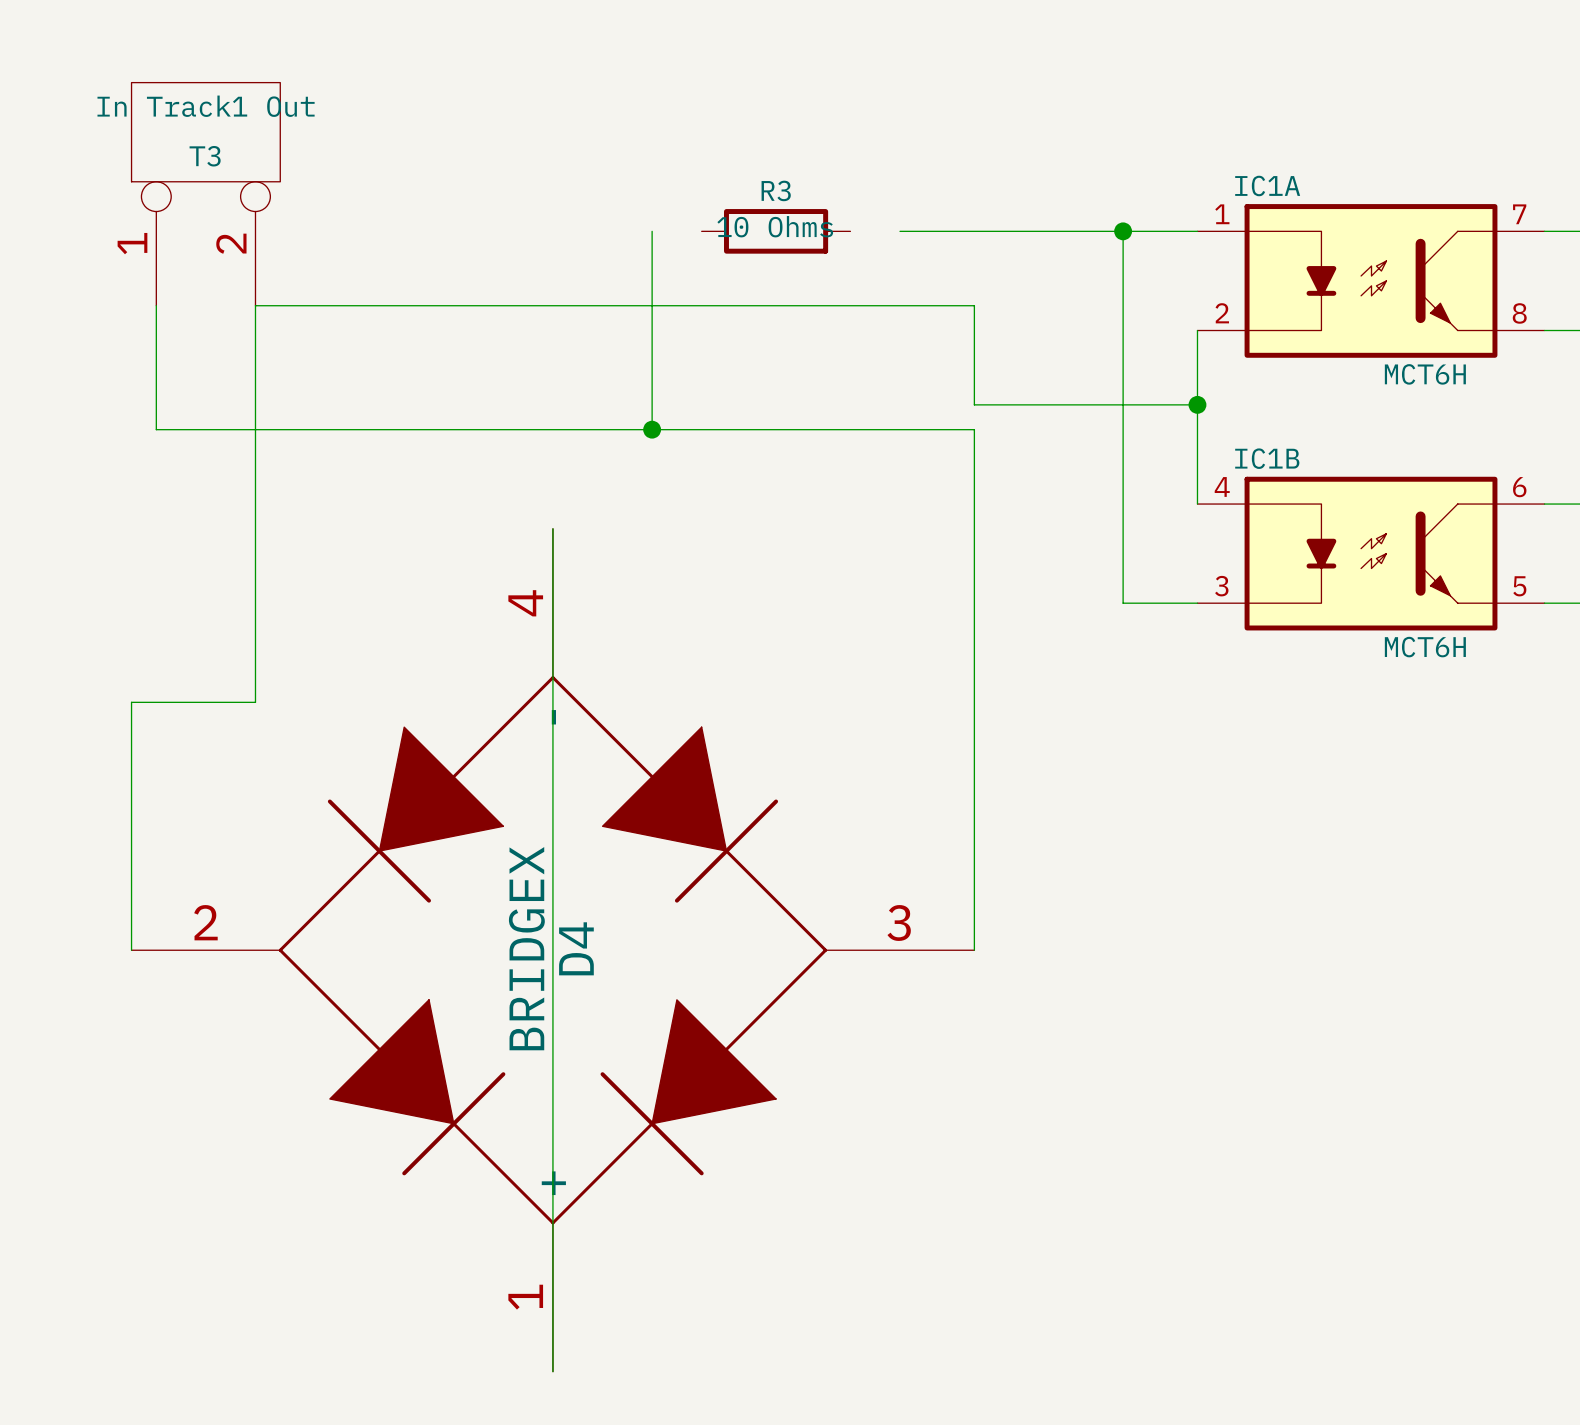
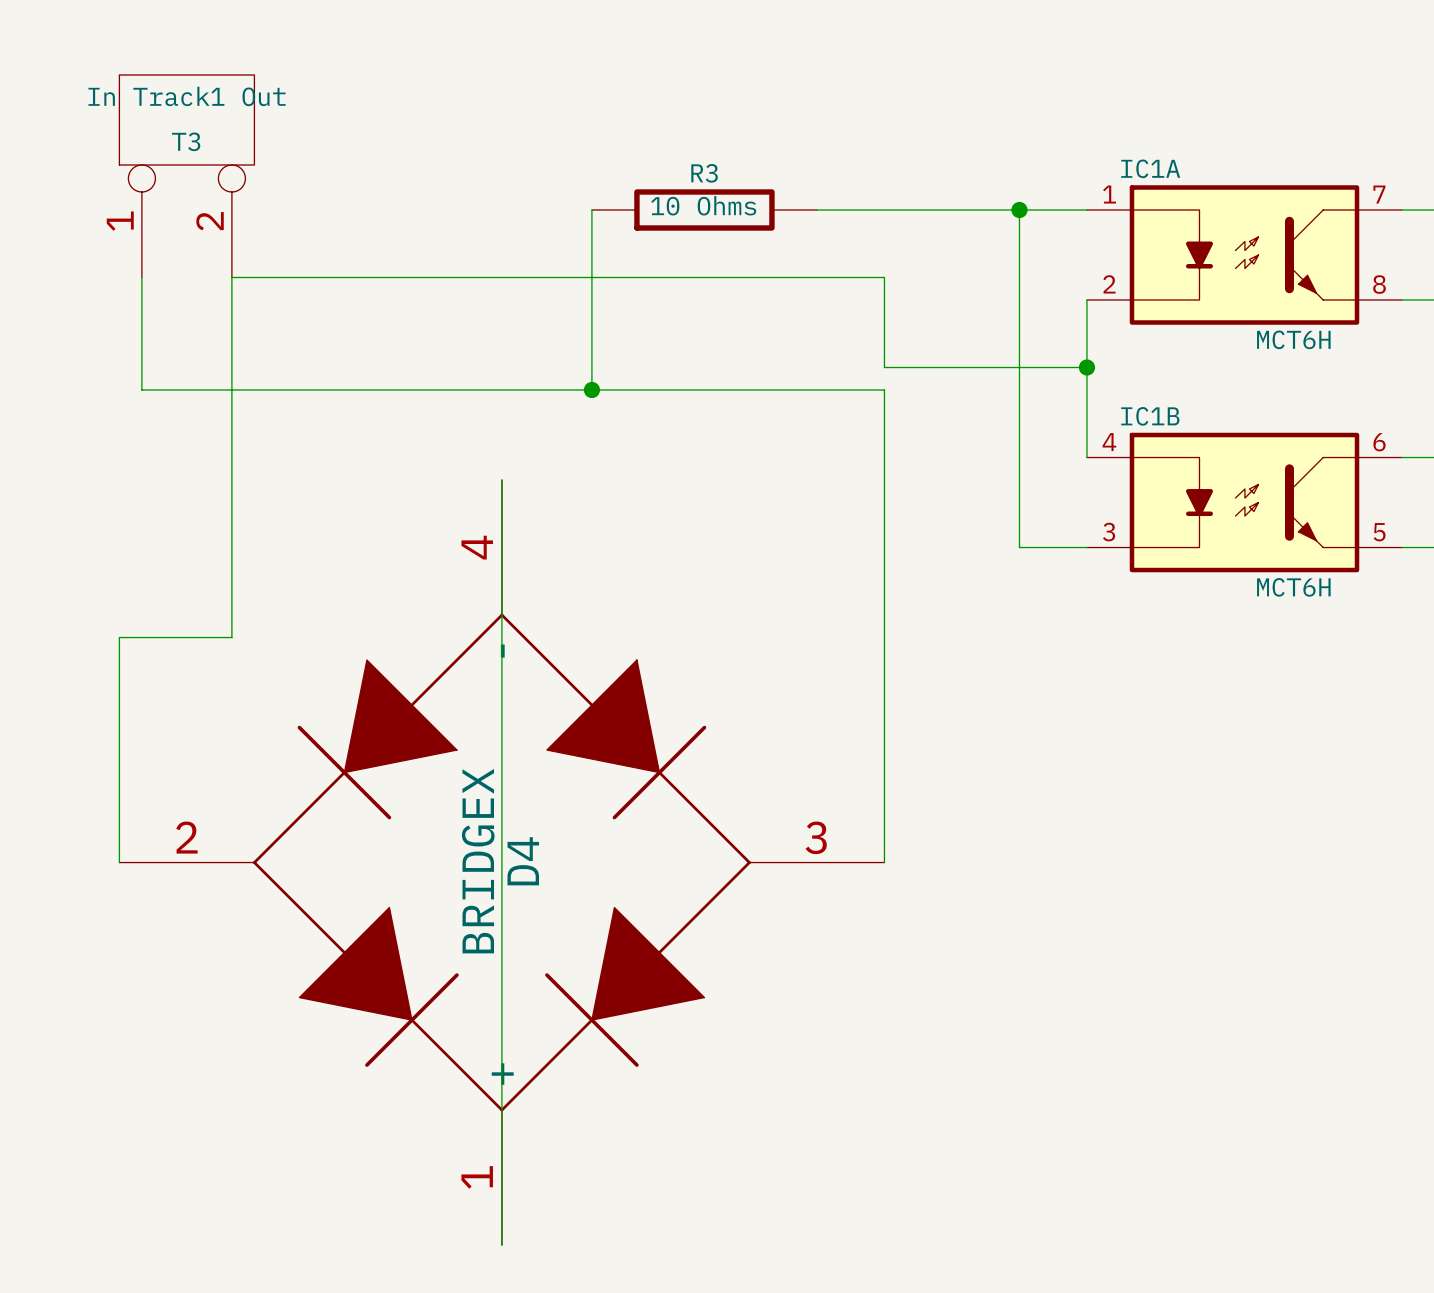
R3 symbol: [701, 209, 851, 254] -> [591, 189, 817, 231]

